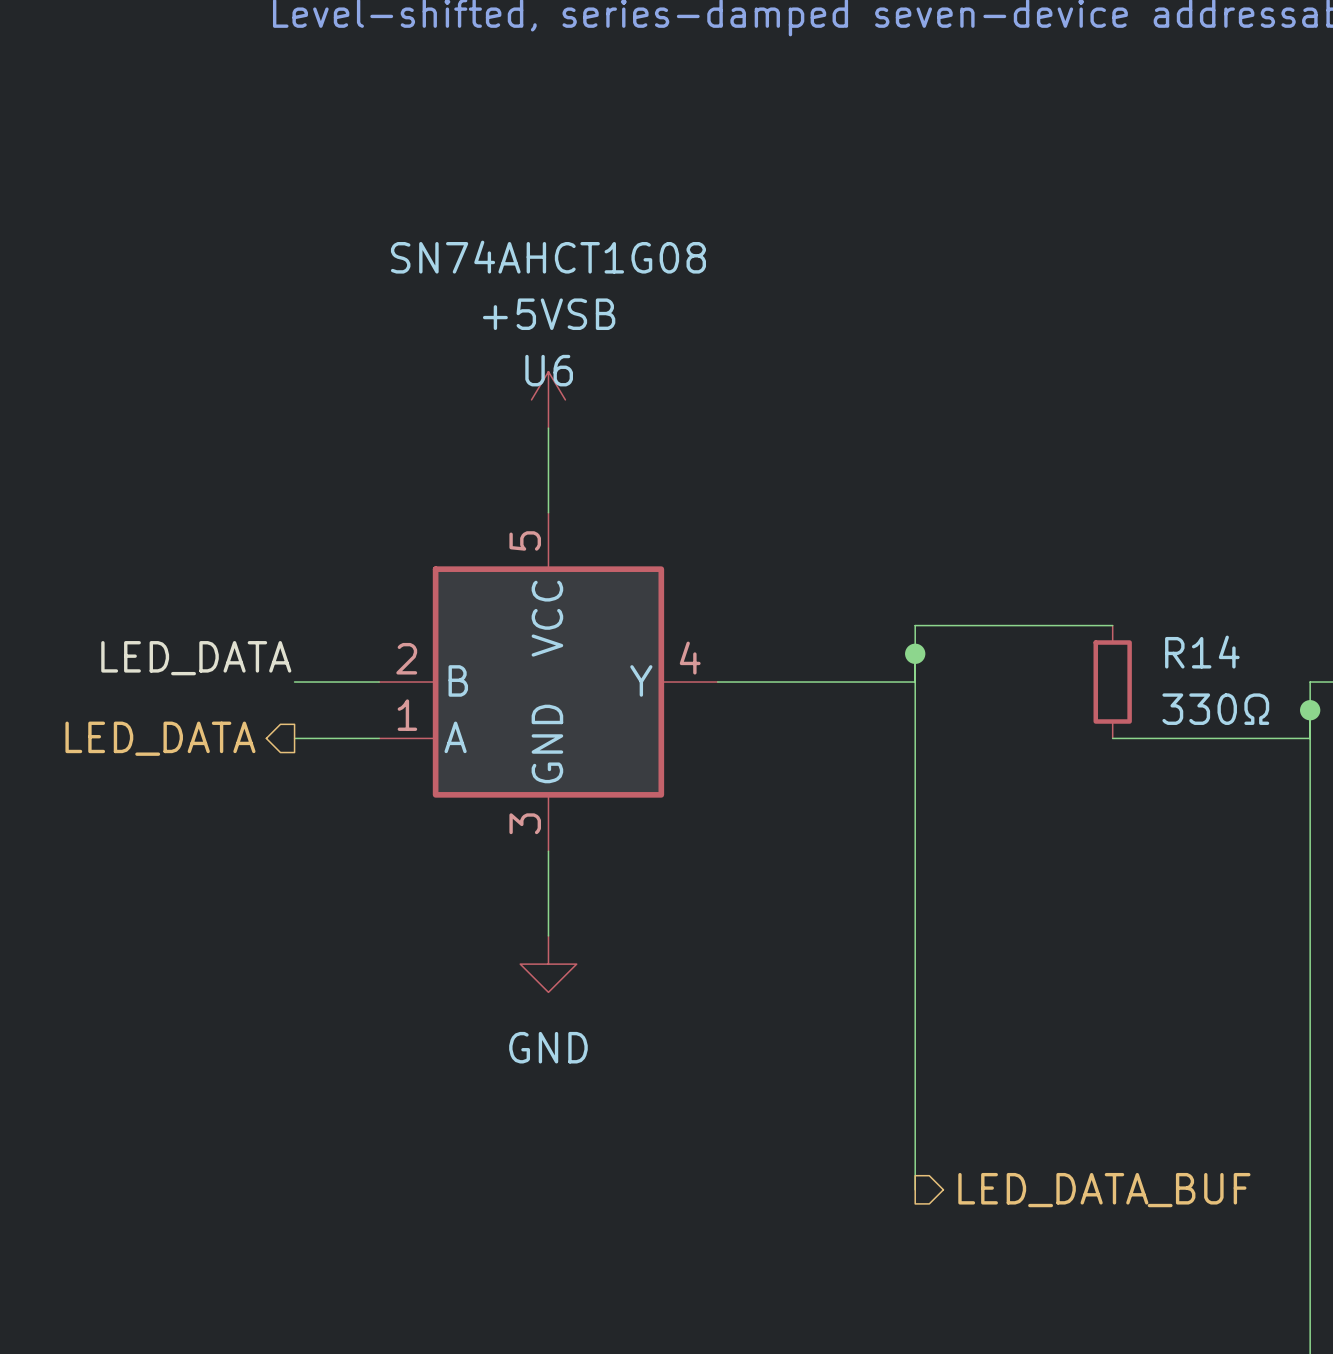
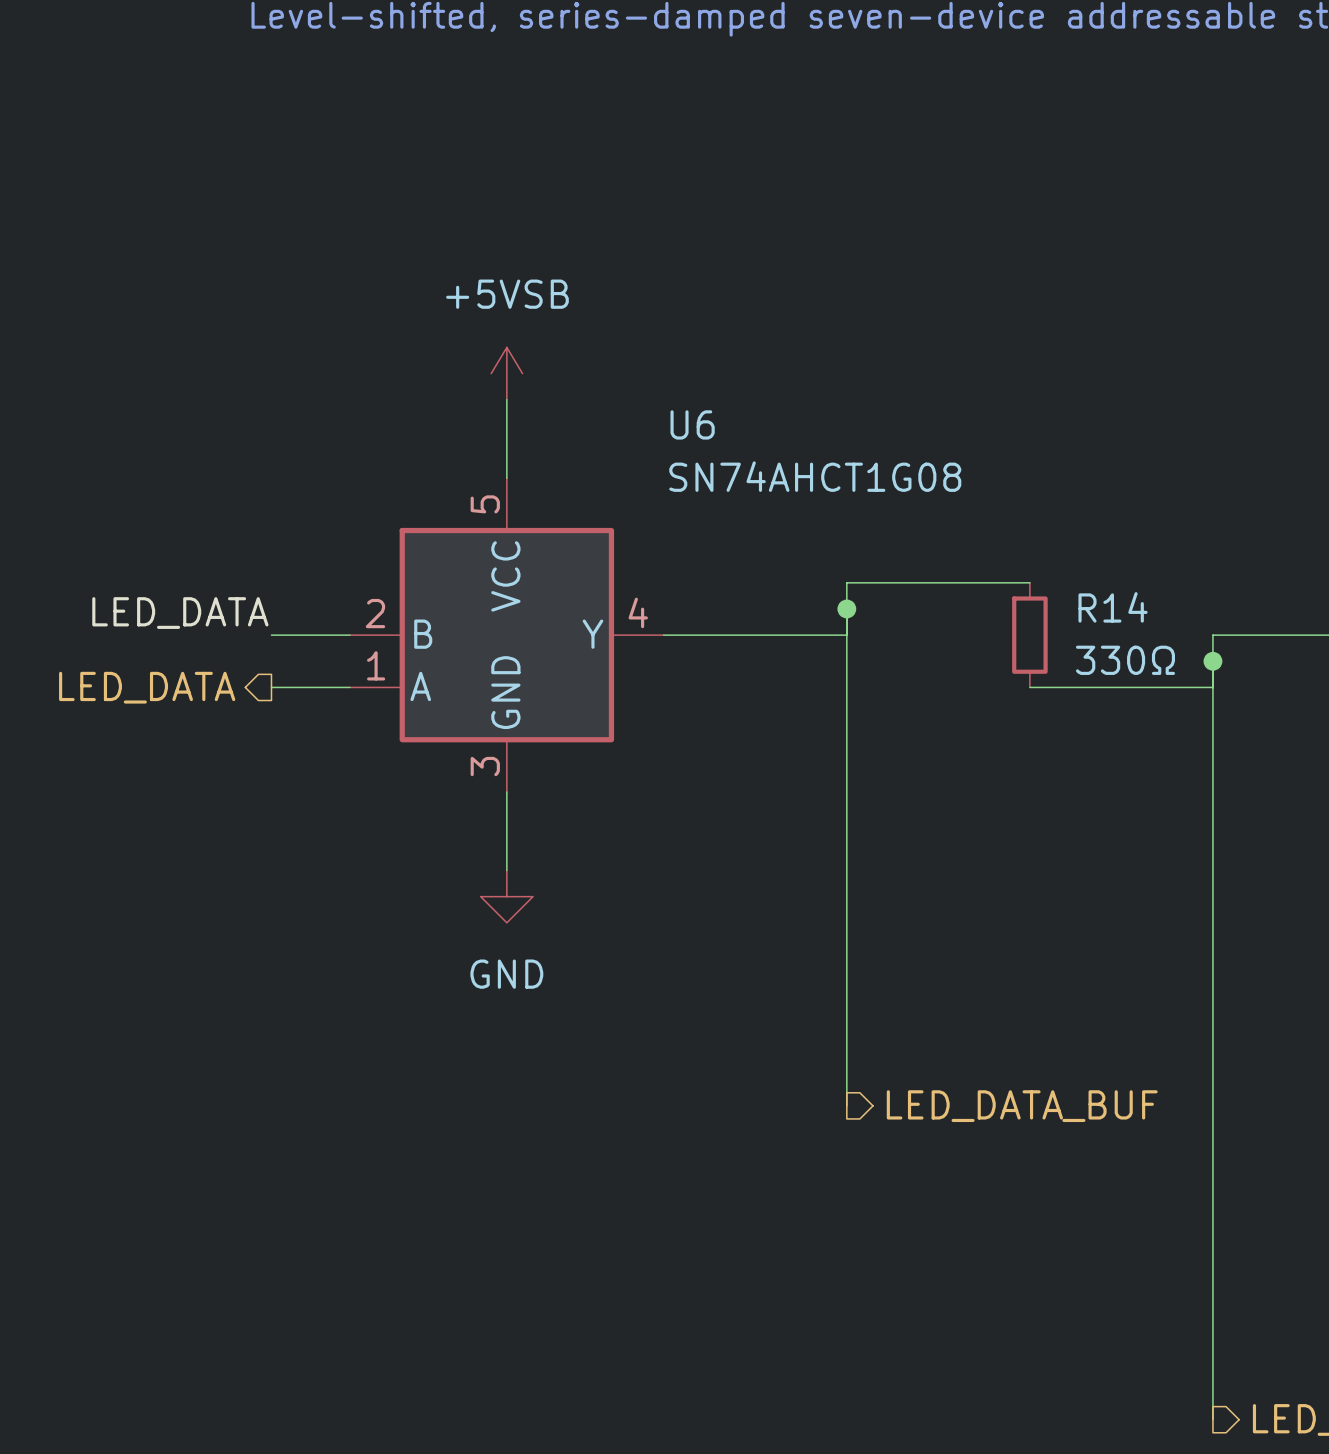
U6 value position: SN74AHCT1G08 (548, 257) -> SN74AHCT1G08 (815, 476)
U6 name position: U6 (549, 370) -> U6 (692, 424)

